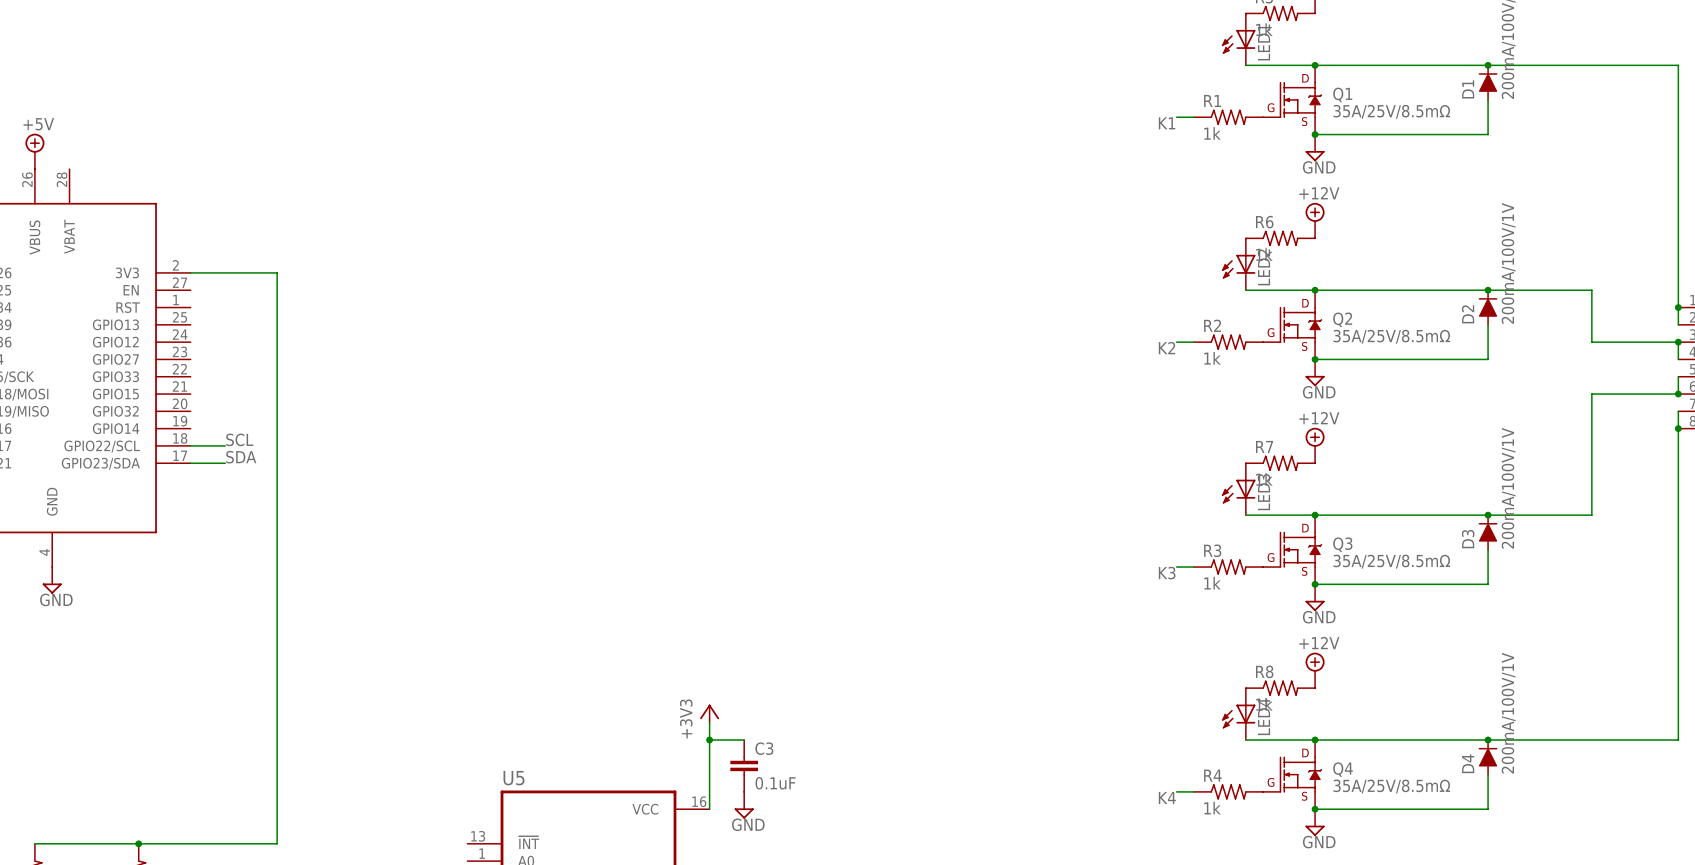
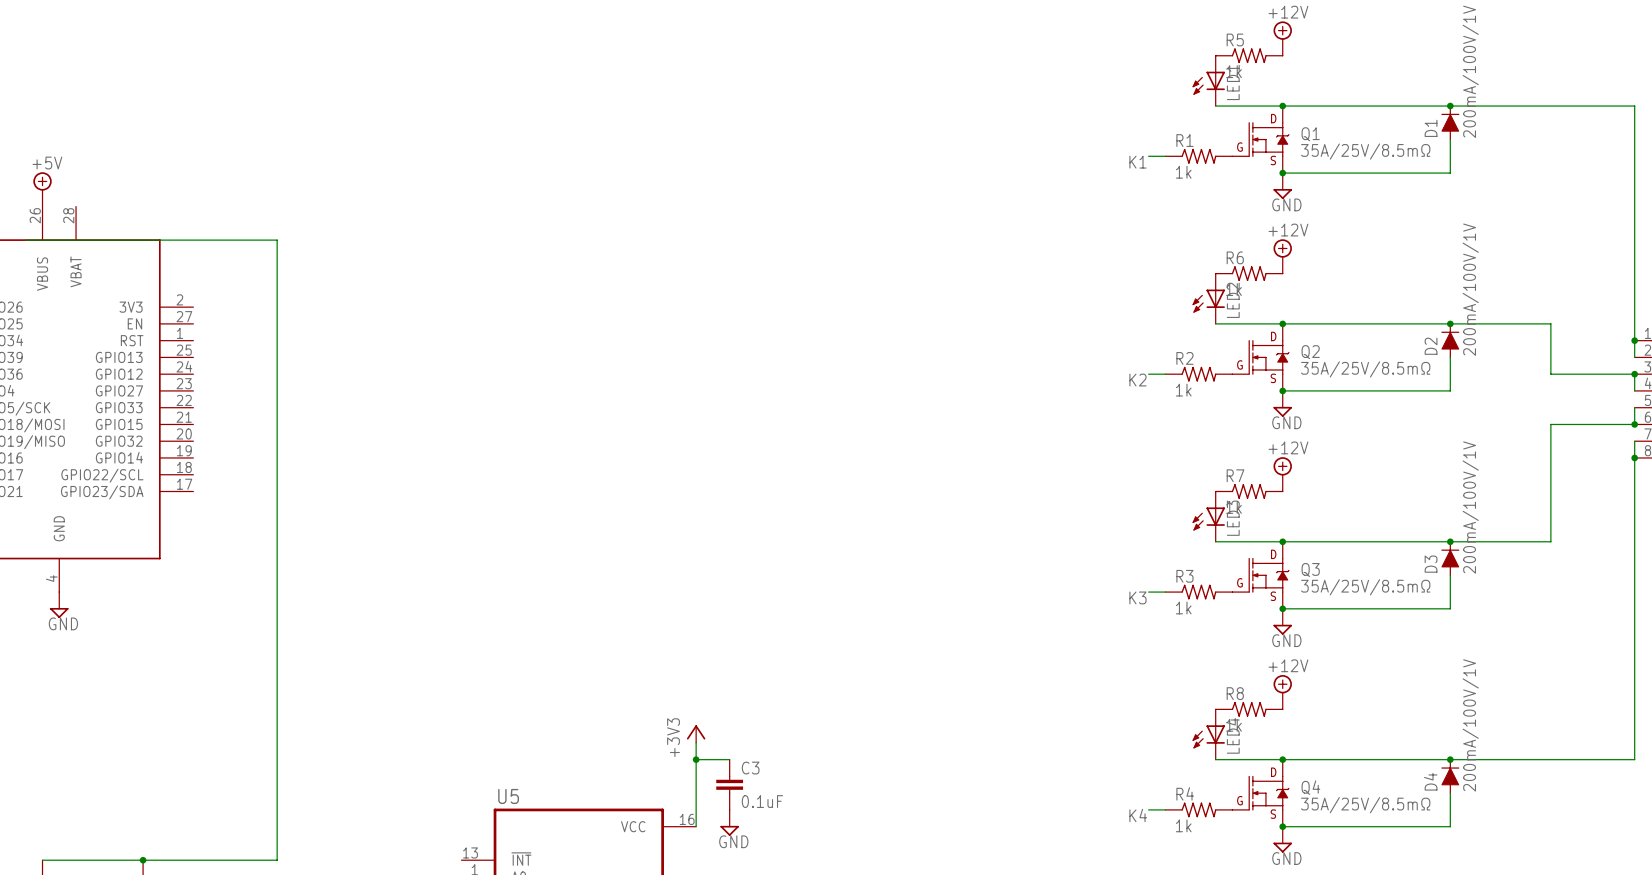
wire: (190, 272) (277, 272) -> (25, 240) (277, 240) (277, 307)
label: SCL (239, 439) -> none
wire: (190, 445) (225, 445) -> none
label: SDA (241, 457) -> none
wire: (190, 463) (225, 463) -> none

